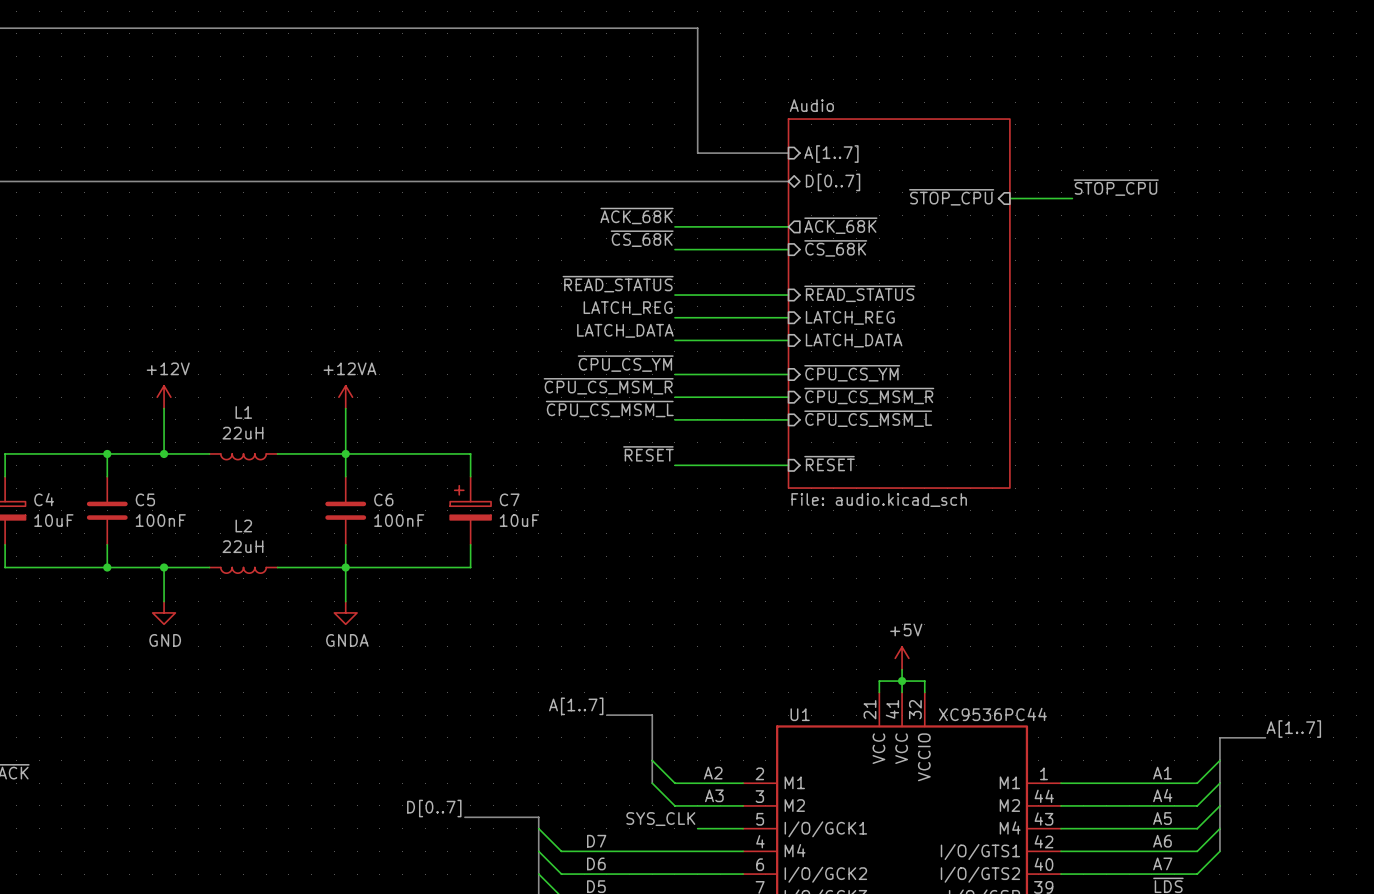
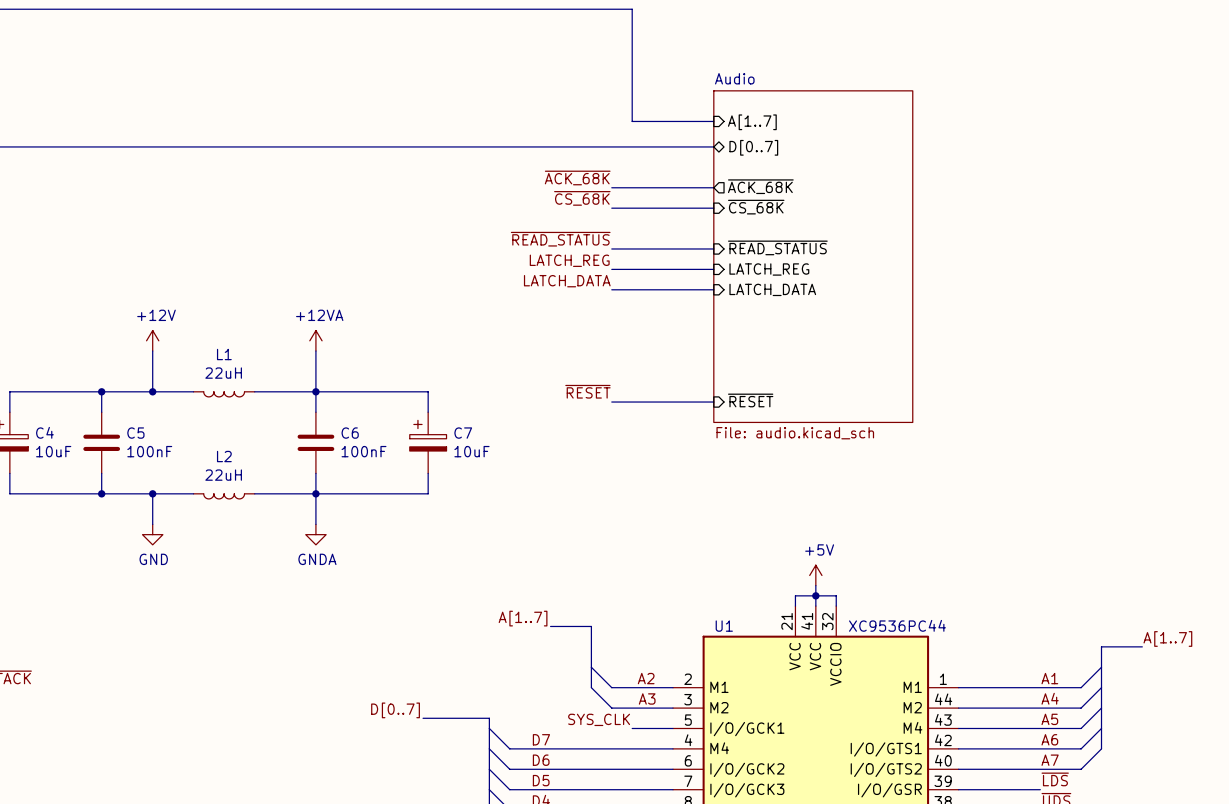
label: ~{STOP_CPU} (1116, 187) -> none
sheet pin: ~{STOP_CPU} (951, 197) -> none
wire: (1009, 198) (1072, 198) -> none
label: ~{CPU_CS_YM} (625, 363) -> none
sheet pin: ~{CPU_CS_YM} (852, 373) -> none
wire: (674, 374) (788, 374) -> none
label: ~{CPU_CS_MSM_R} (608, 386) -> none
sheet pin: ~{CPU_CS_MSM_R} (869, 396) -> none
wire: (674, 397) (788, 397) -> none
label: ~{CPU_CS_MSM_L} (609, 409) -> none
sheet pin: ~{CPU_CS_MSM_L} (868, 418) -> none
wire: (674, 419) (788, 419) -> none

